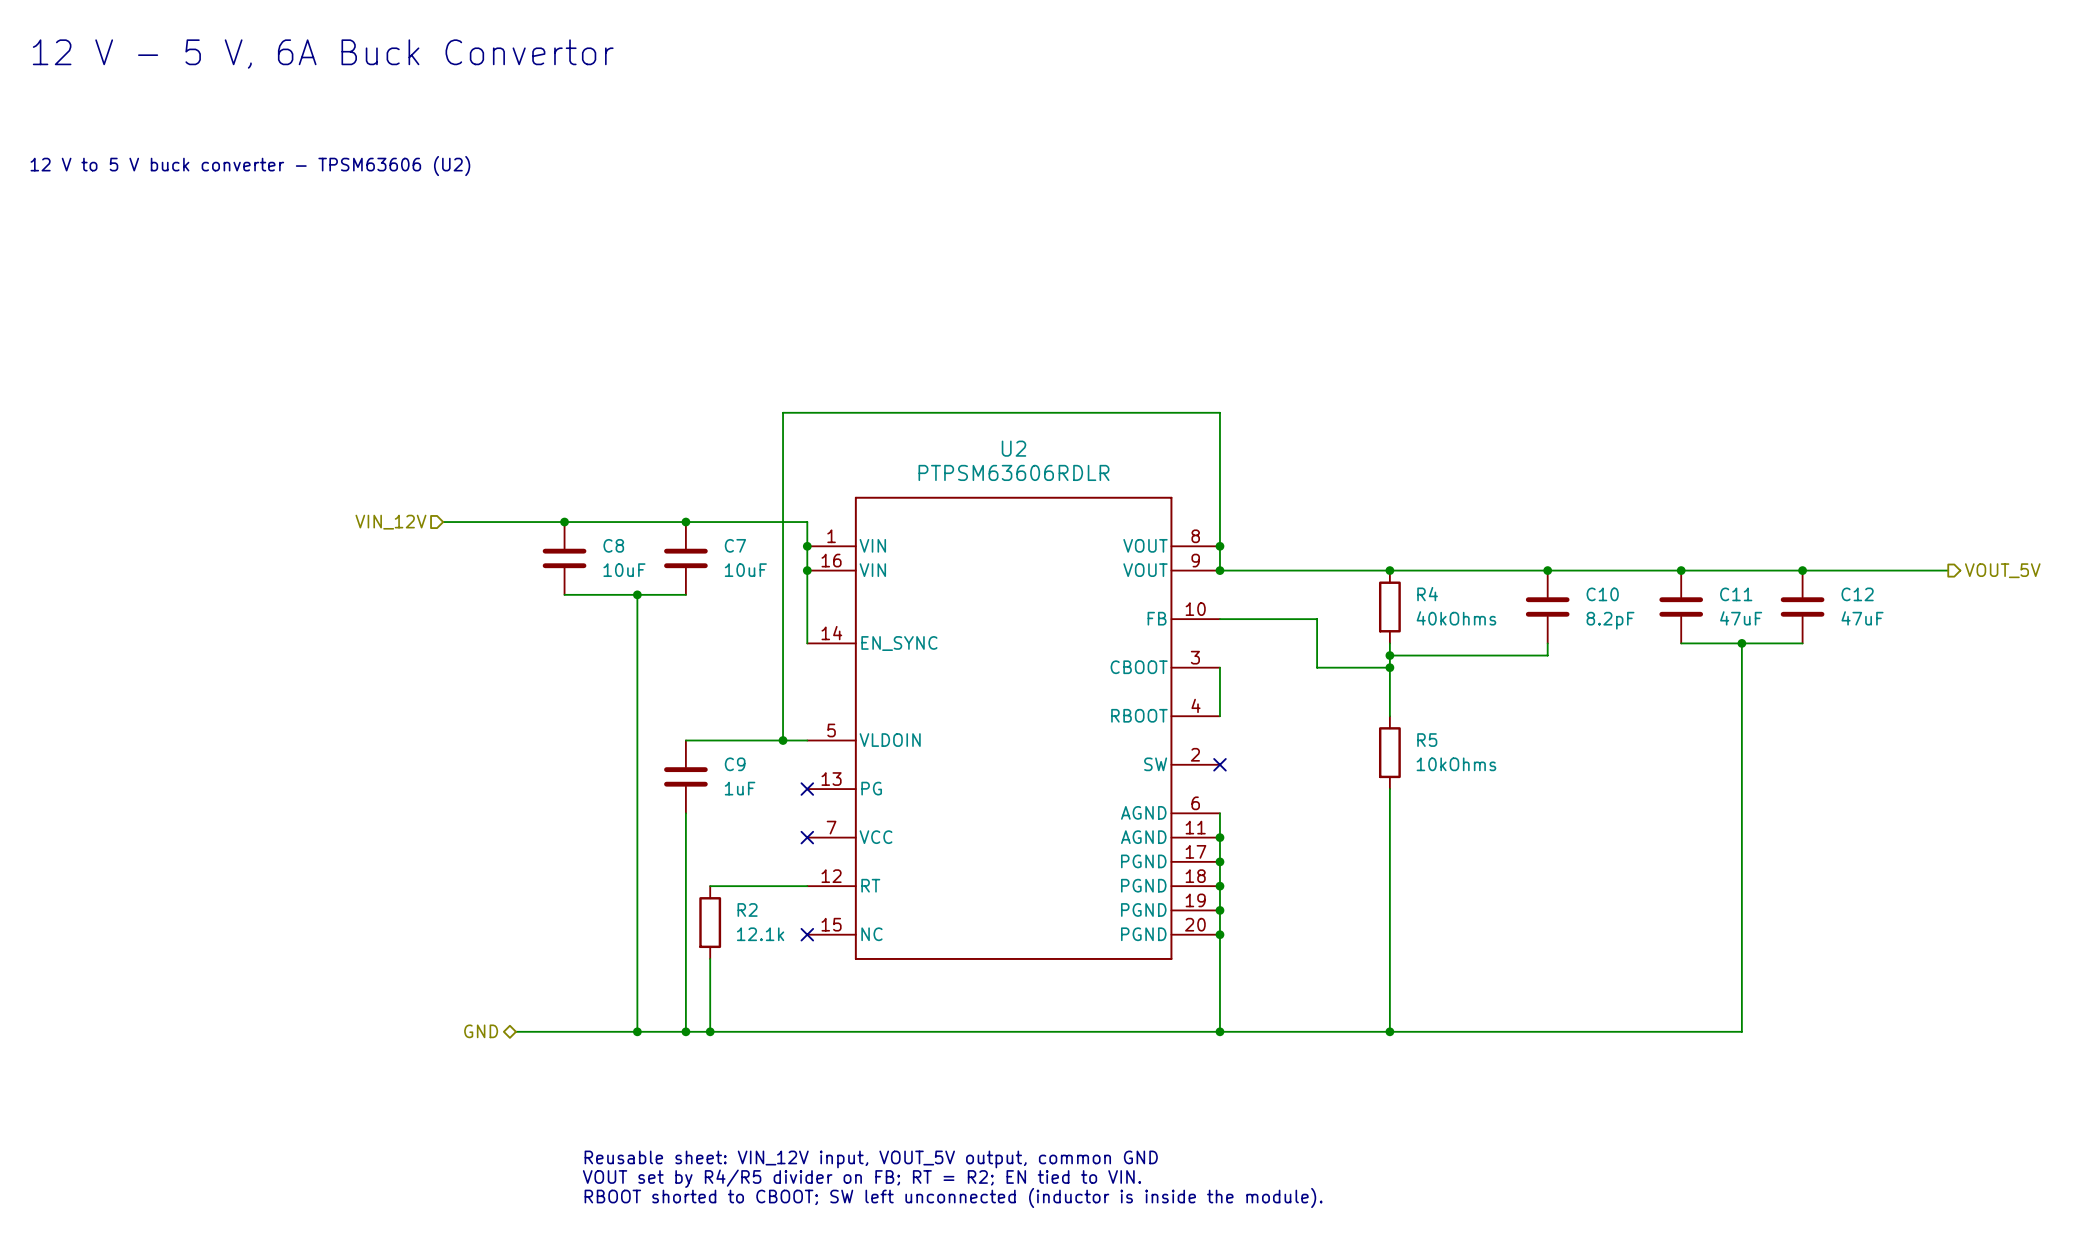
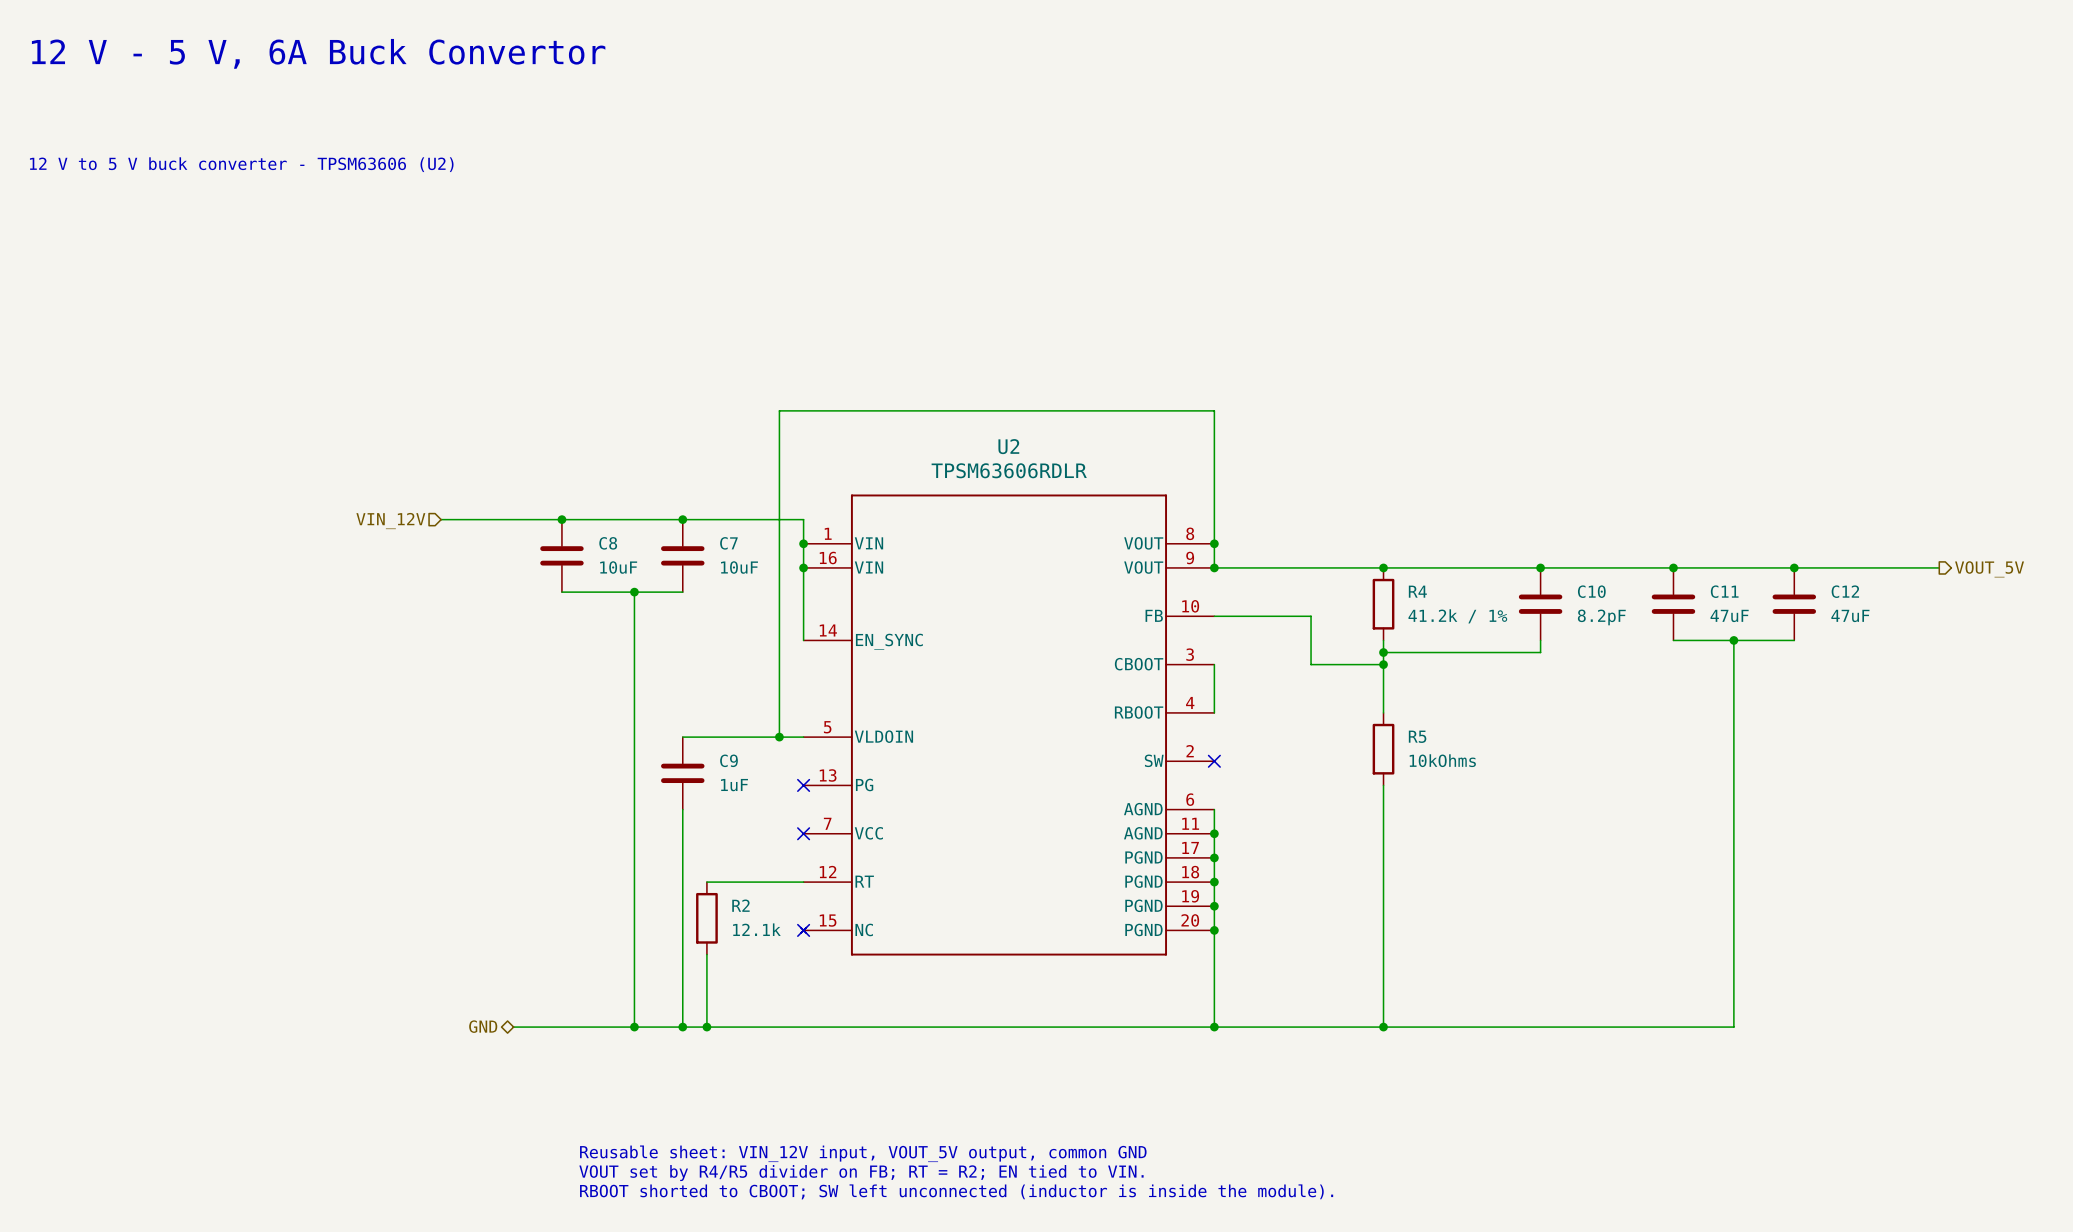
U2 value: PTPSM63606RDLR (1013, 472) -> TPSM63606RDLR (1009, 470)
U2 symbol: [807, 496, 1220, 960] -> [800, 494, 1215, 956]
R4 value: 40kOhms (1456, 618) -> 41.2k / 1% (1457, 616)

